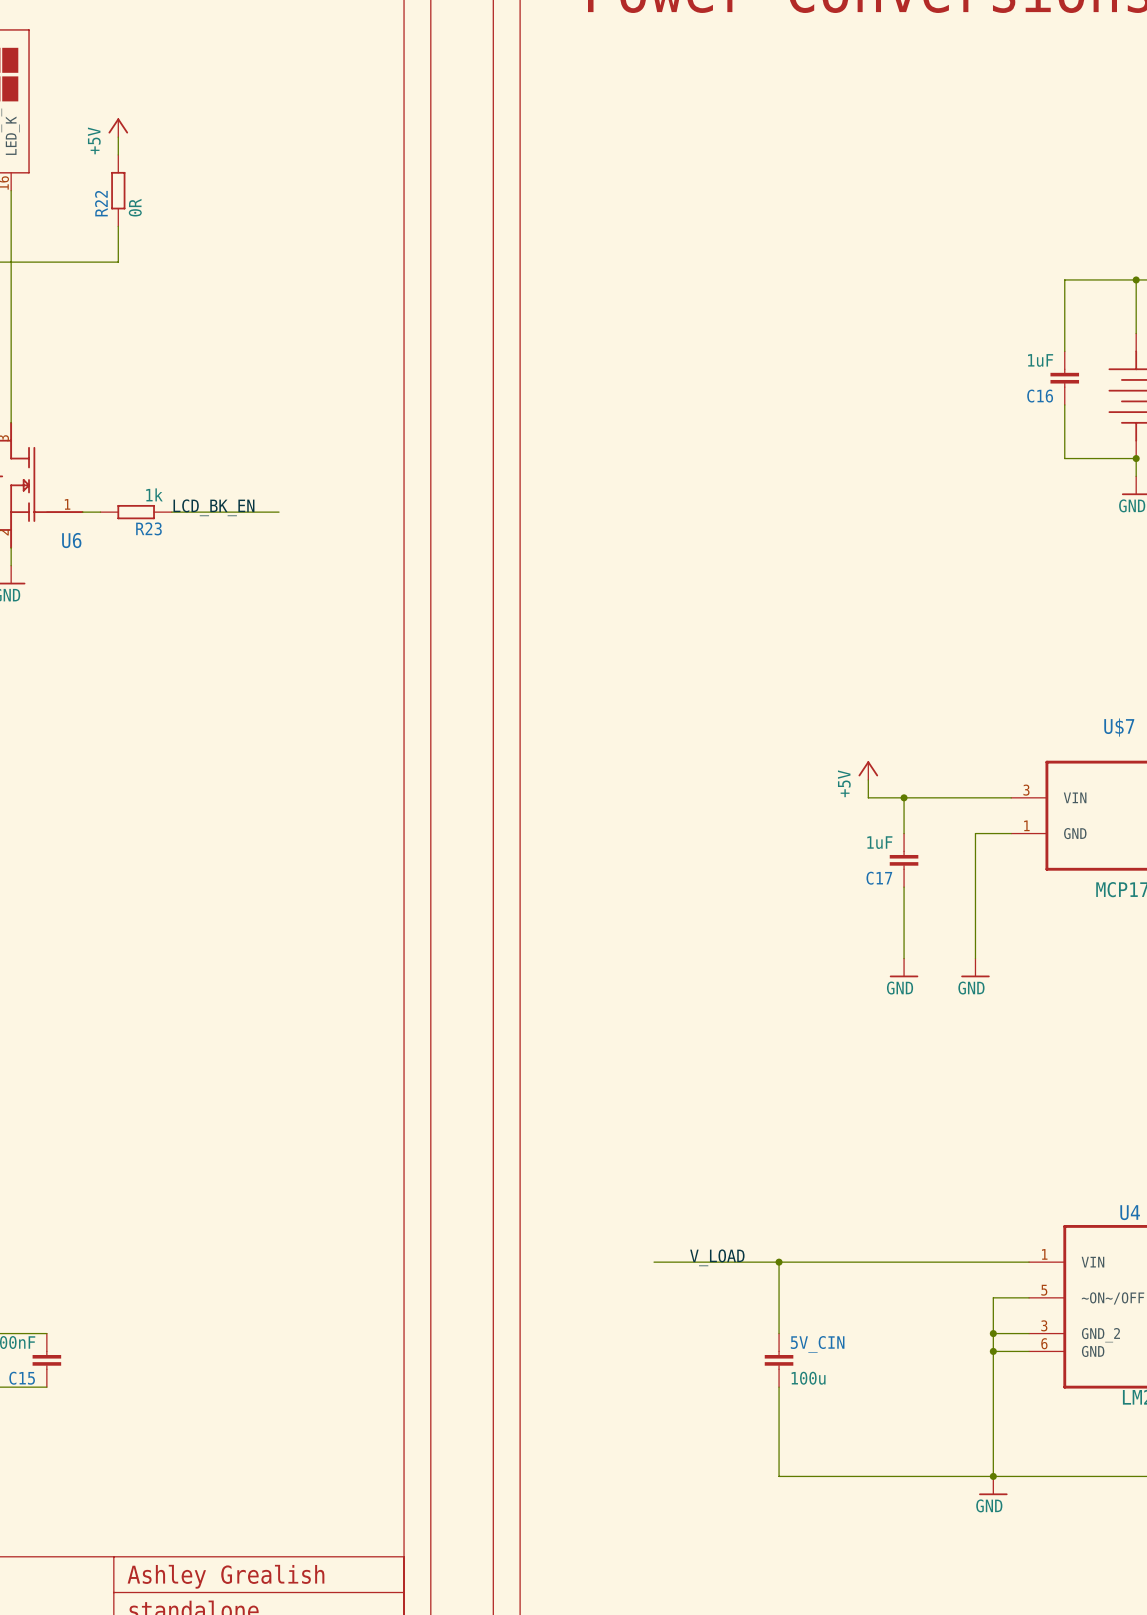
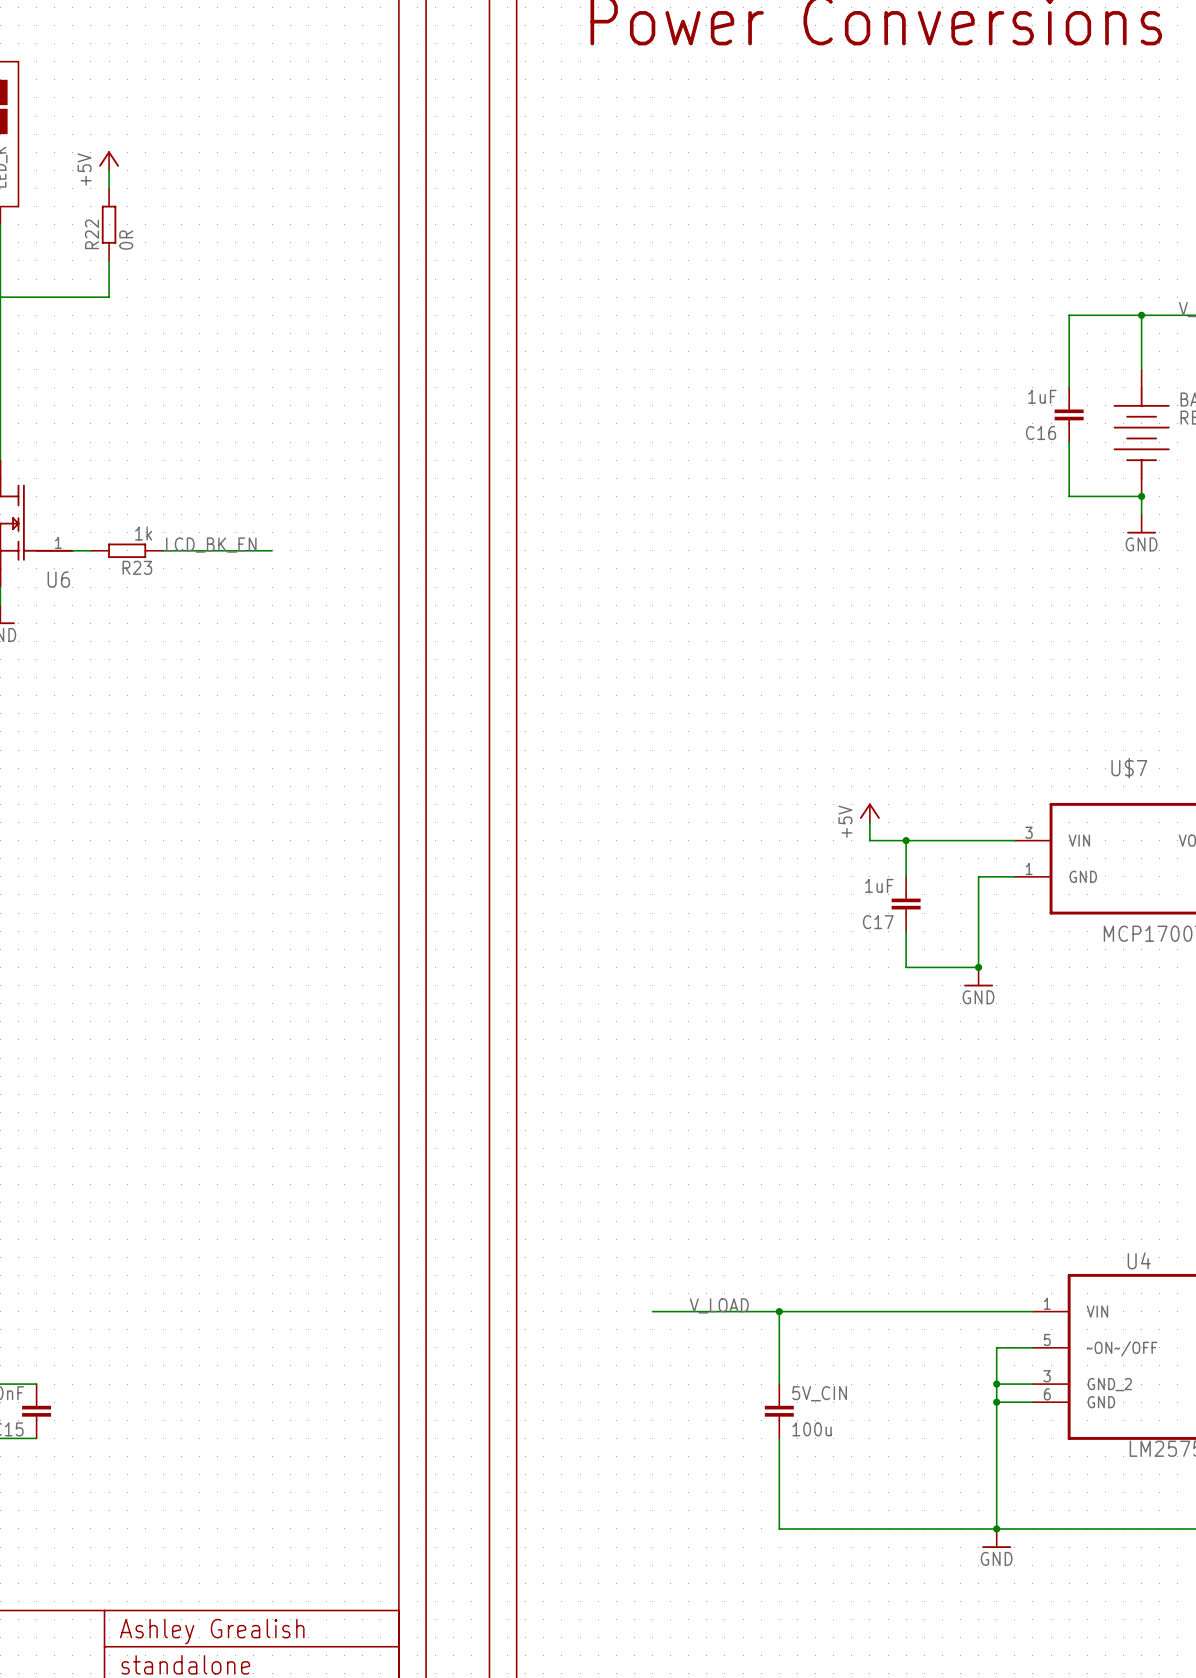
wire: (904, 922) (904, 958) -> (906, 967) (978, 967)
junction: none -> (978, 967)
power symbol: GND (904, 967) -> none
power symbol position: GND (975, 967) -> GND (978, 976)

